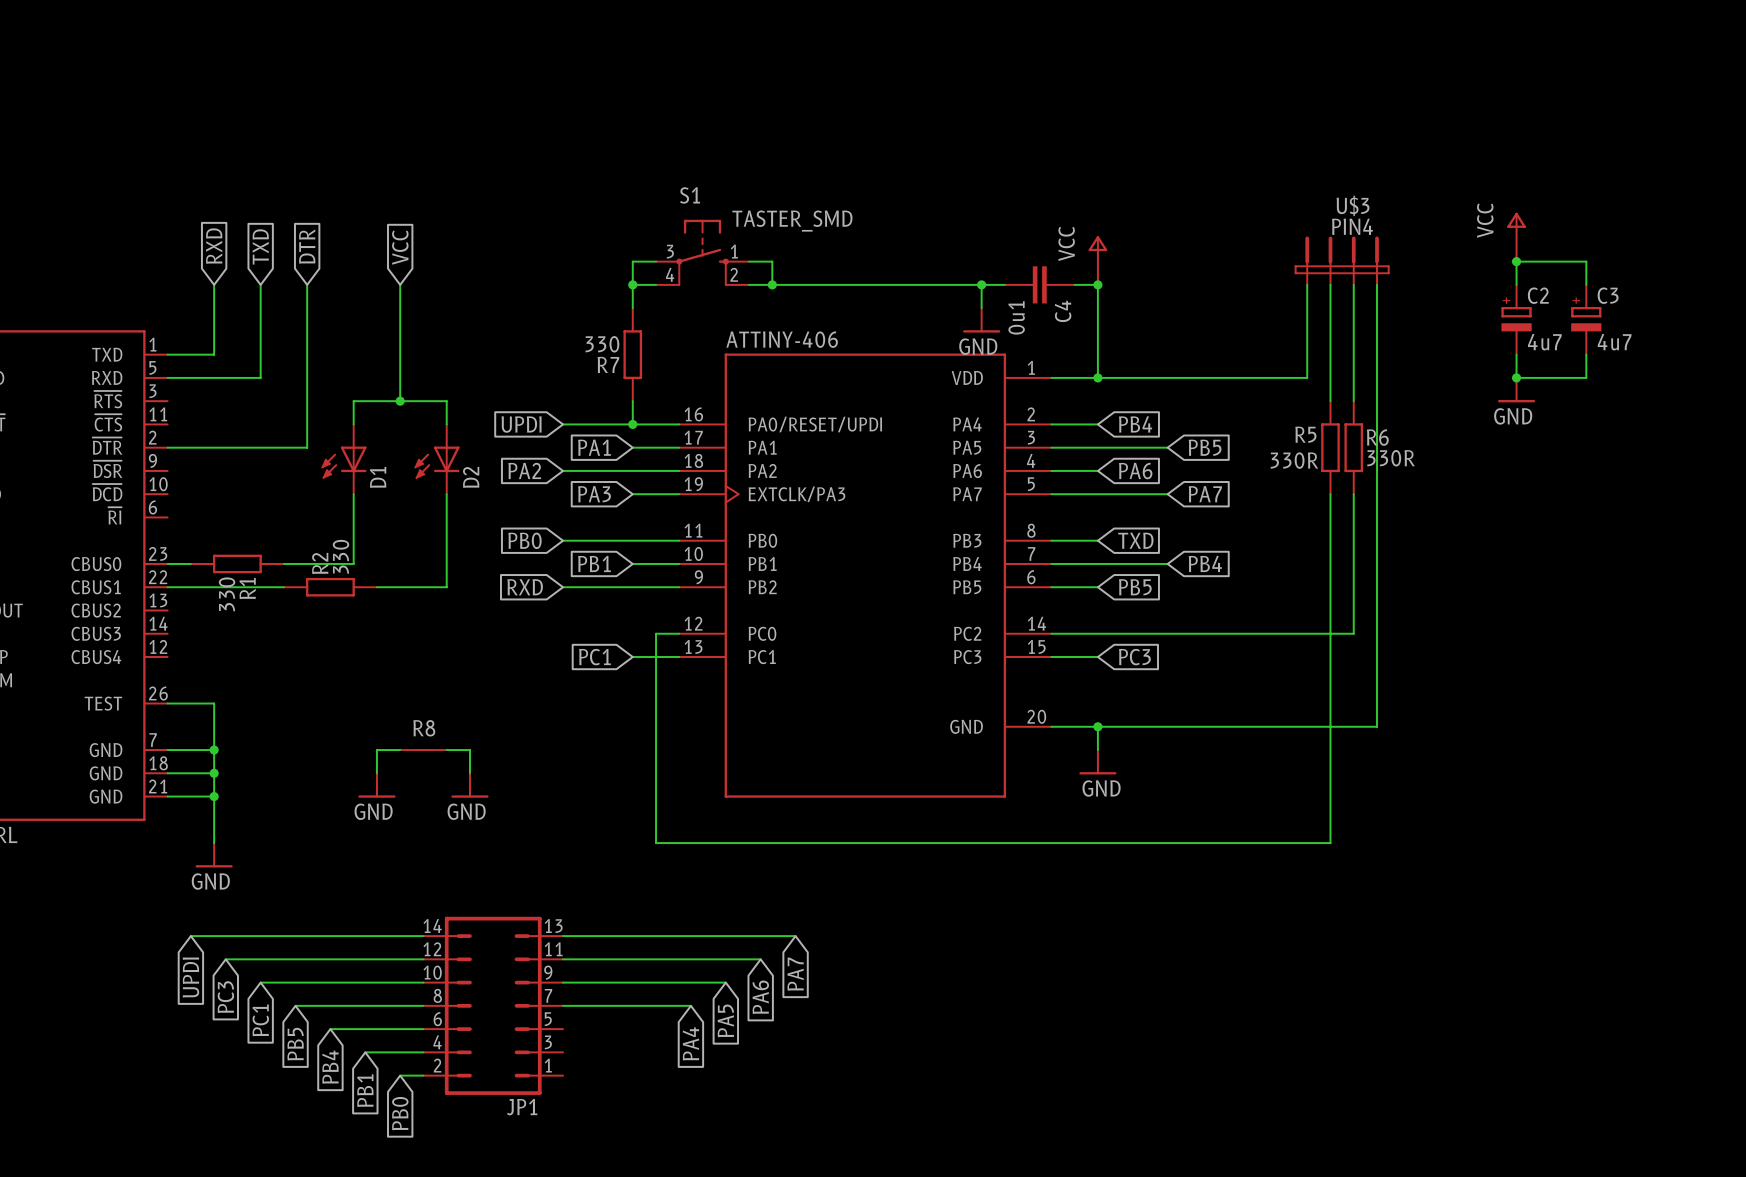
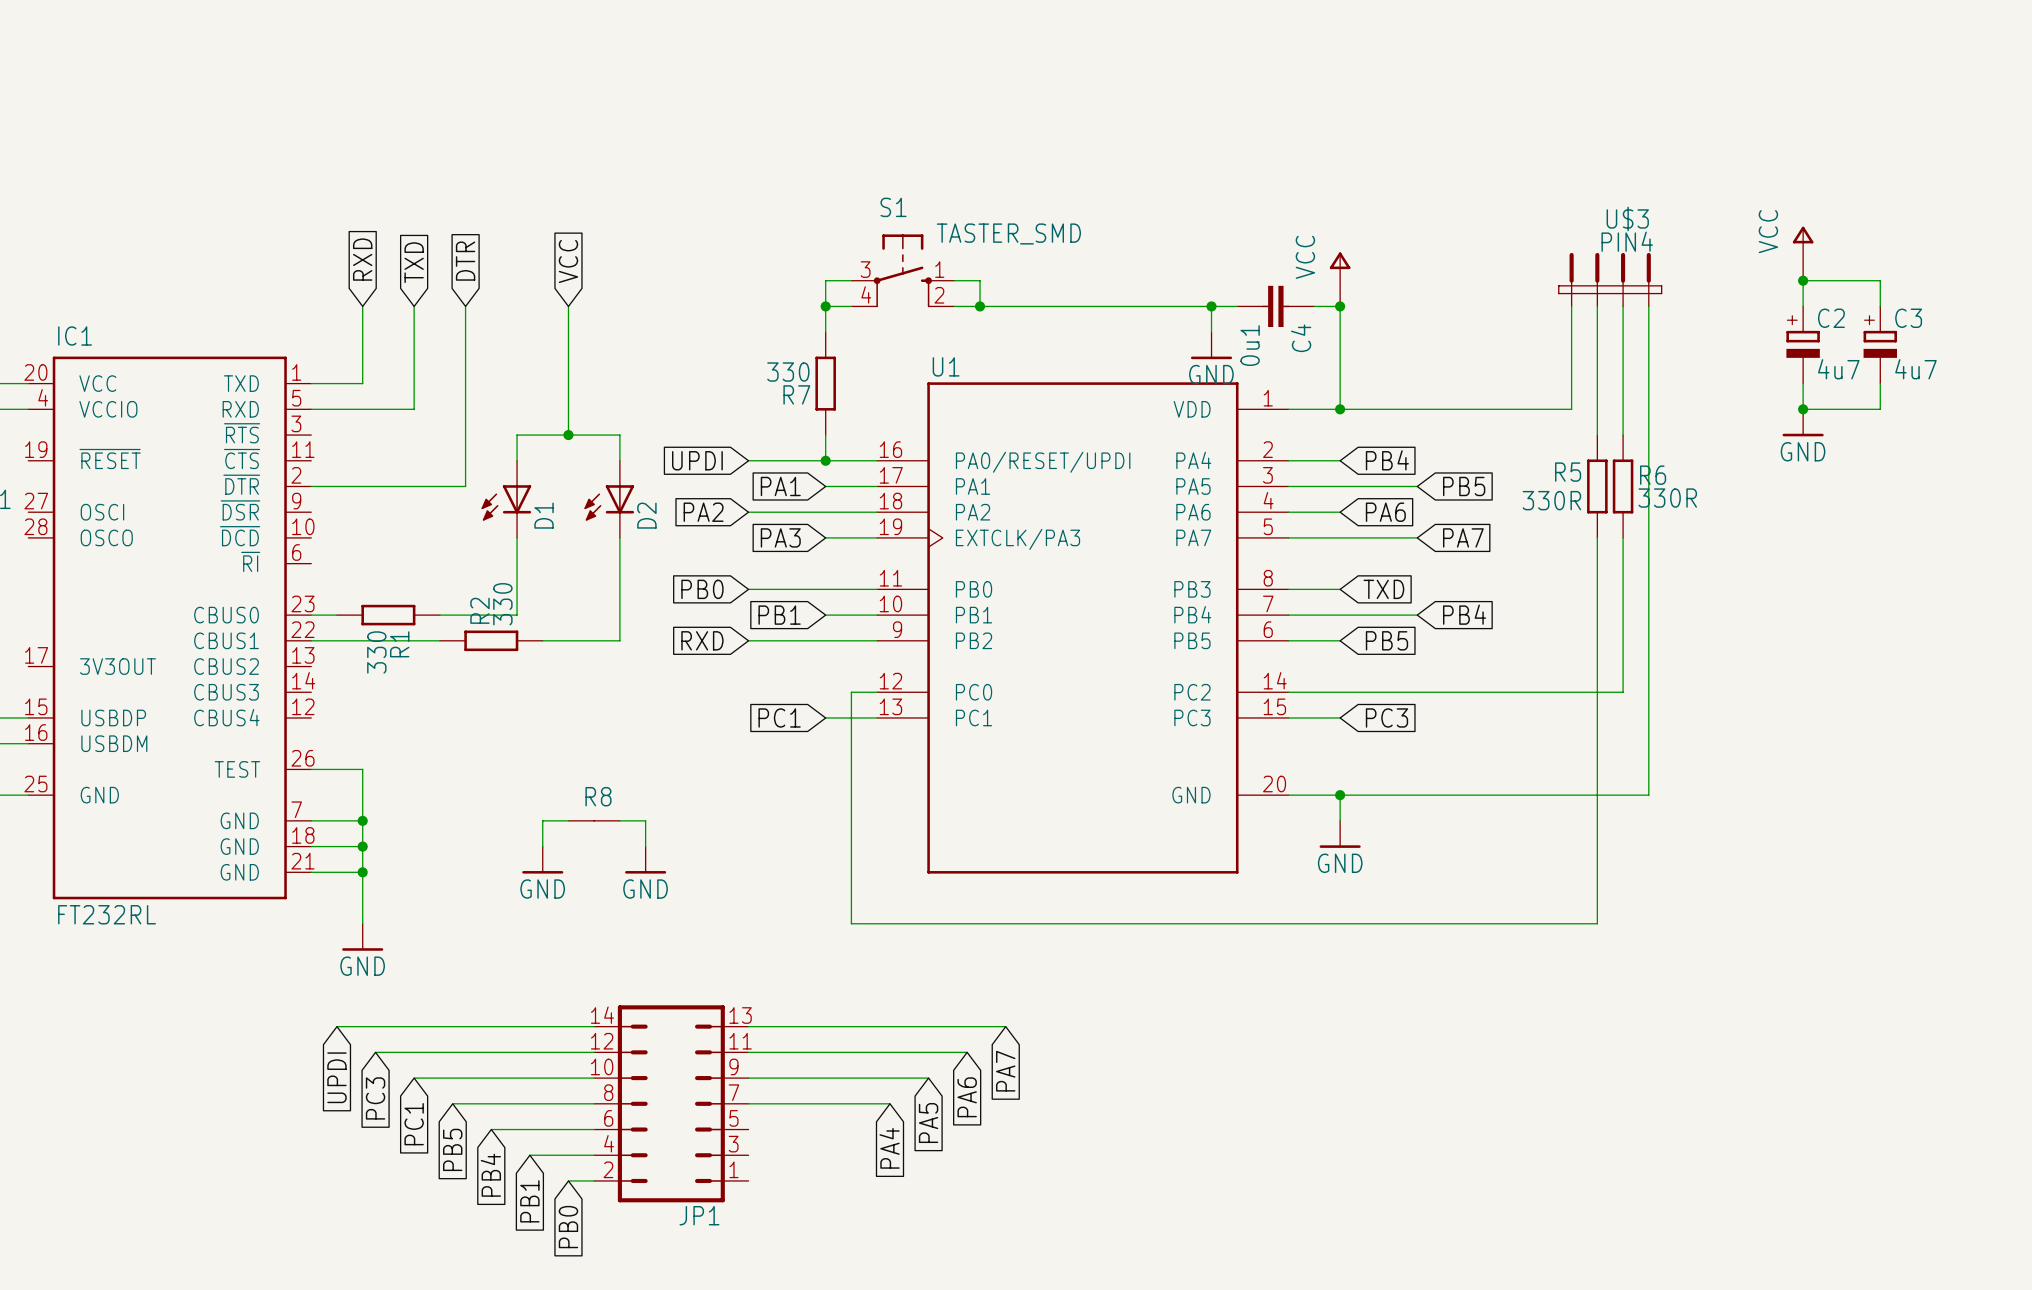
ATTINY-406 name: ATTINY-406 (782, 339) -> U1 (946, 366)

